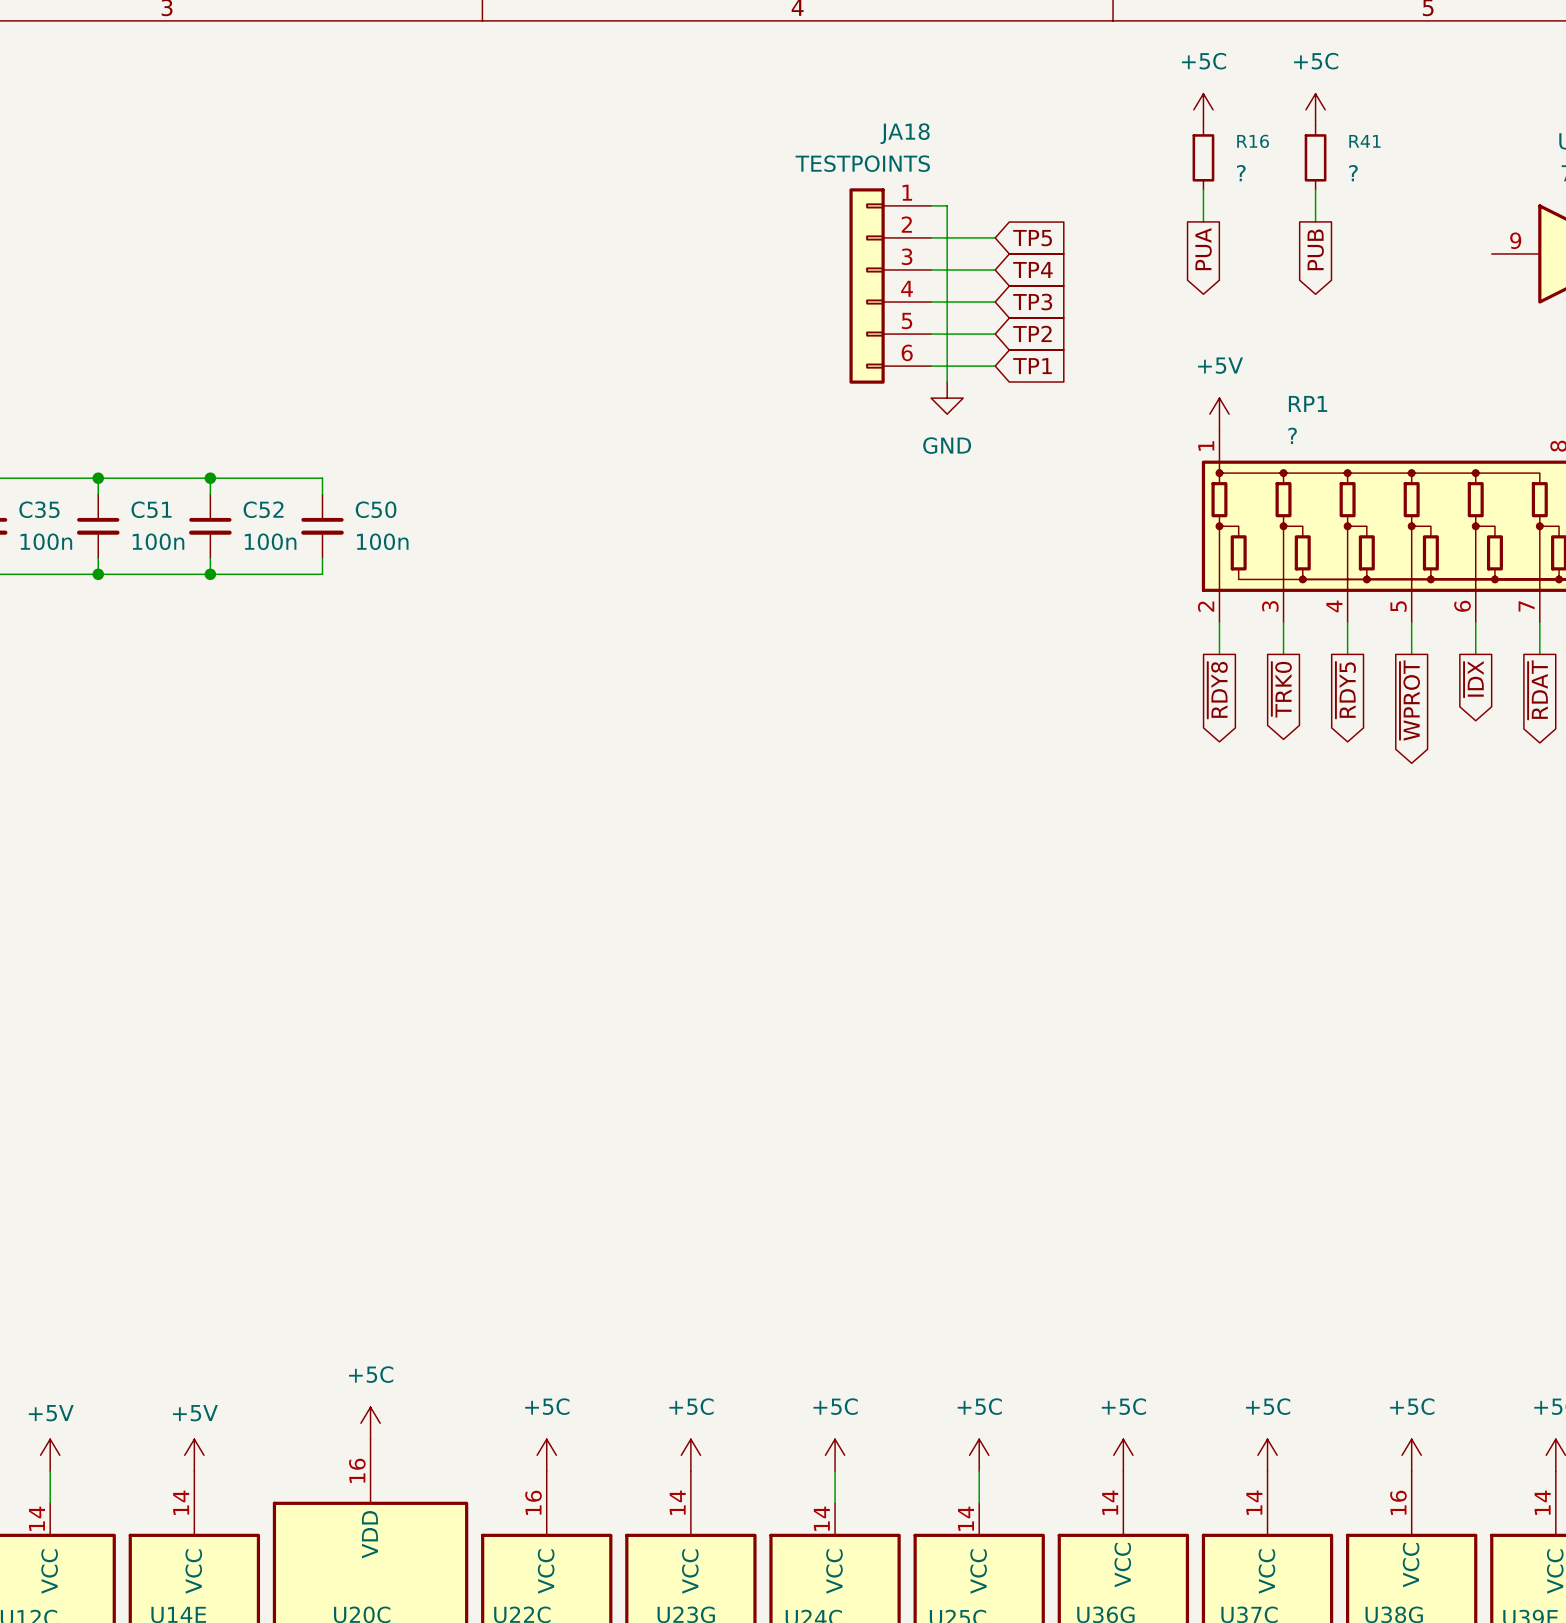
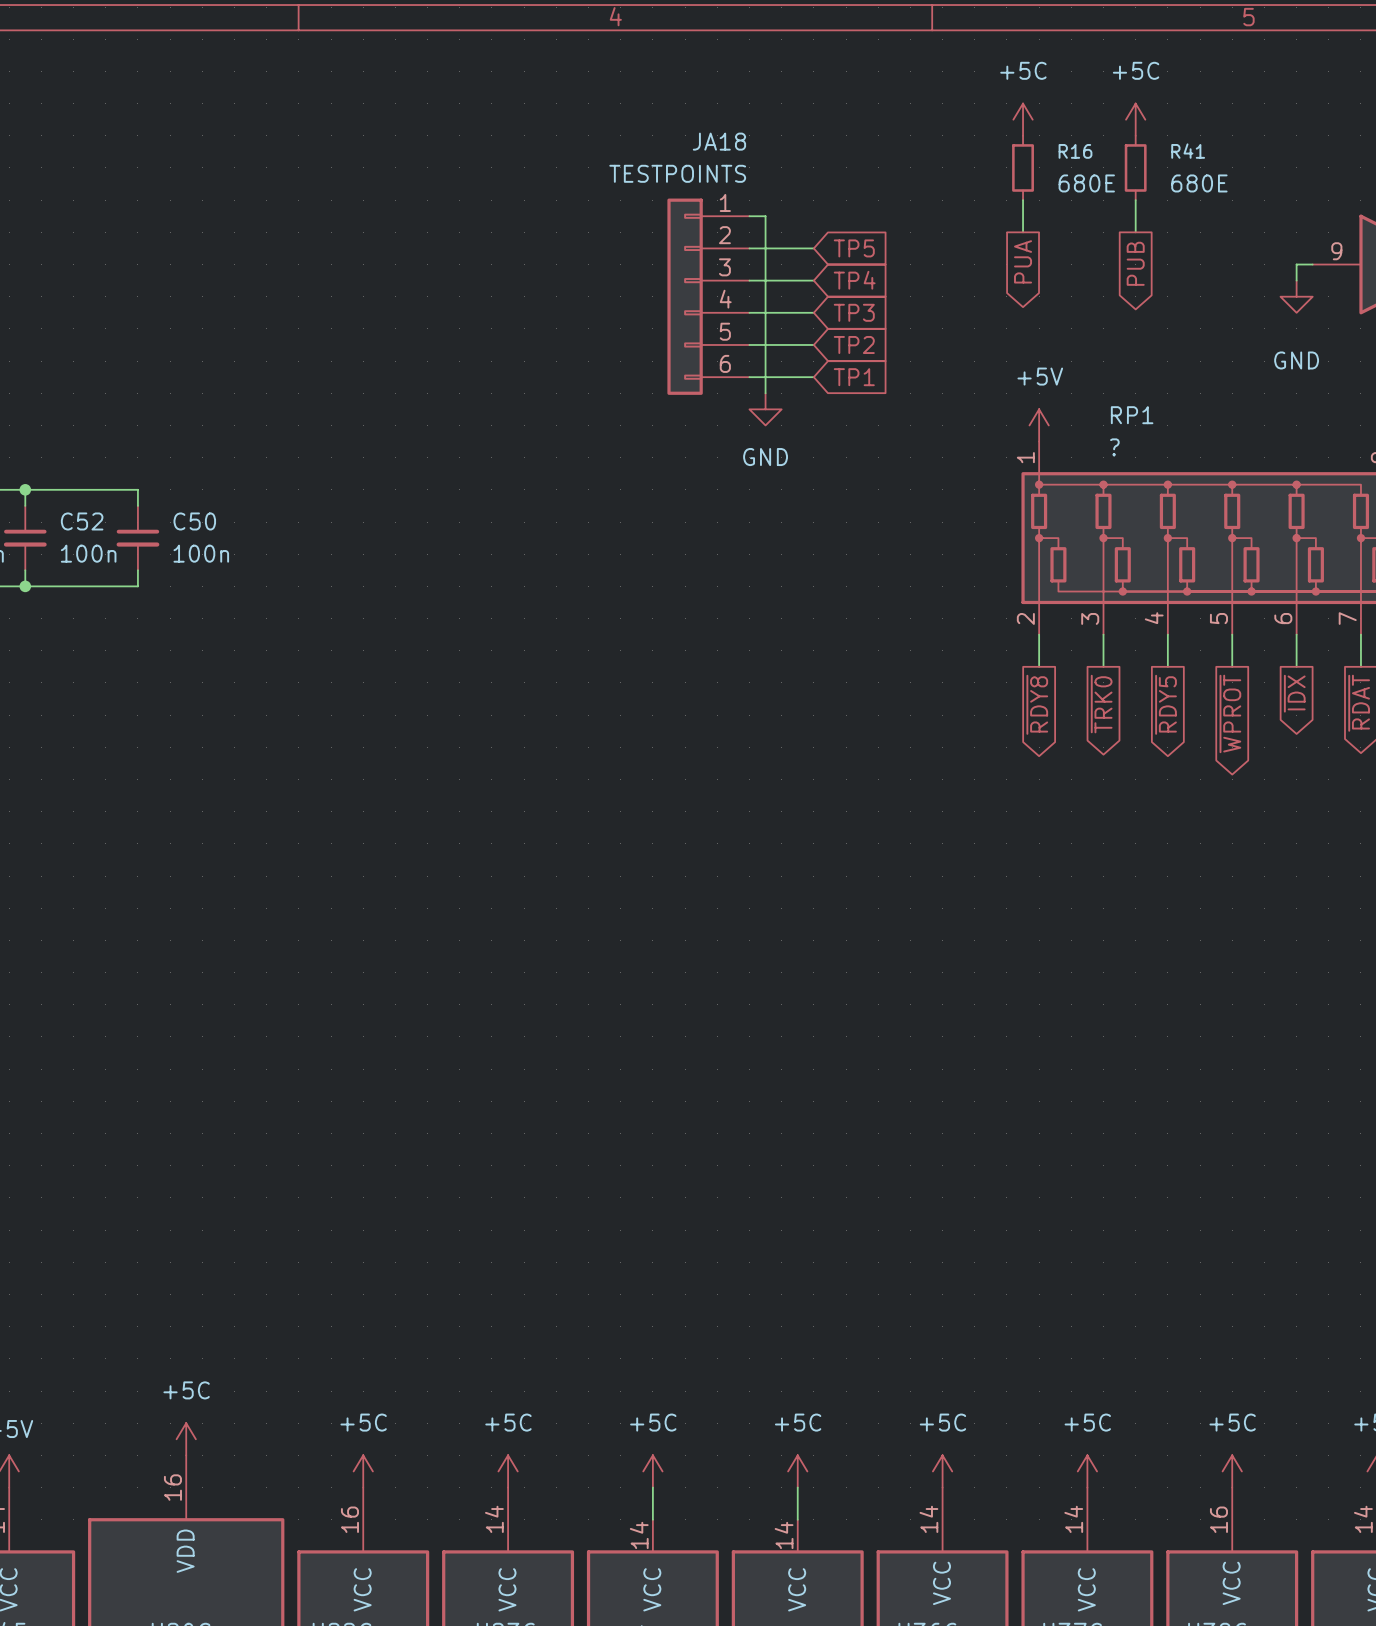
R16 value: ? (1241, 173) -> 680E (1086, 183)
R41 value: ? (1353, 173) -> 680E (1199, 183)
wire: none -> (1312, 264) (1296, 264) (1296, 280)
power symbol: none -> GND (1296, 296)

